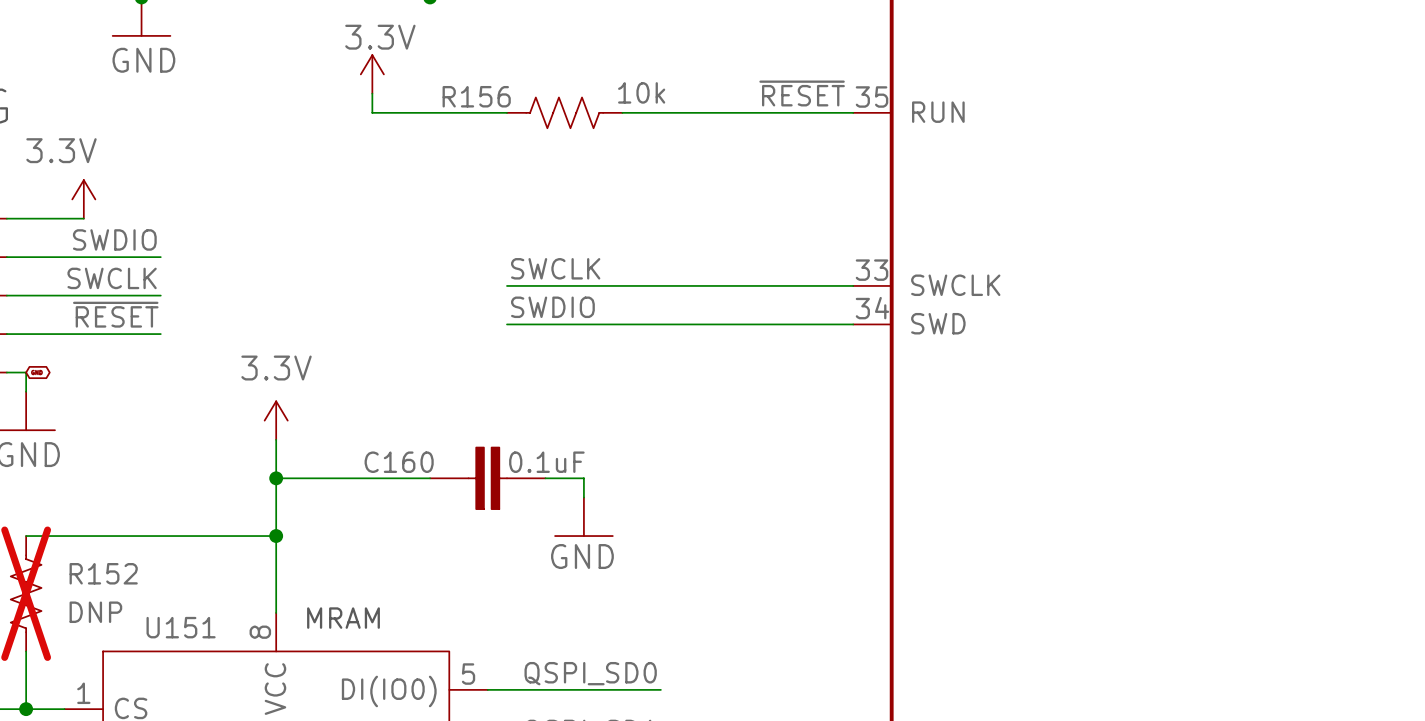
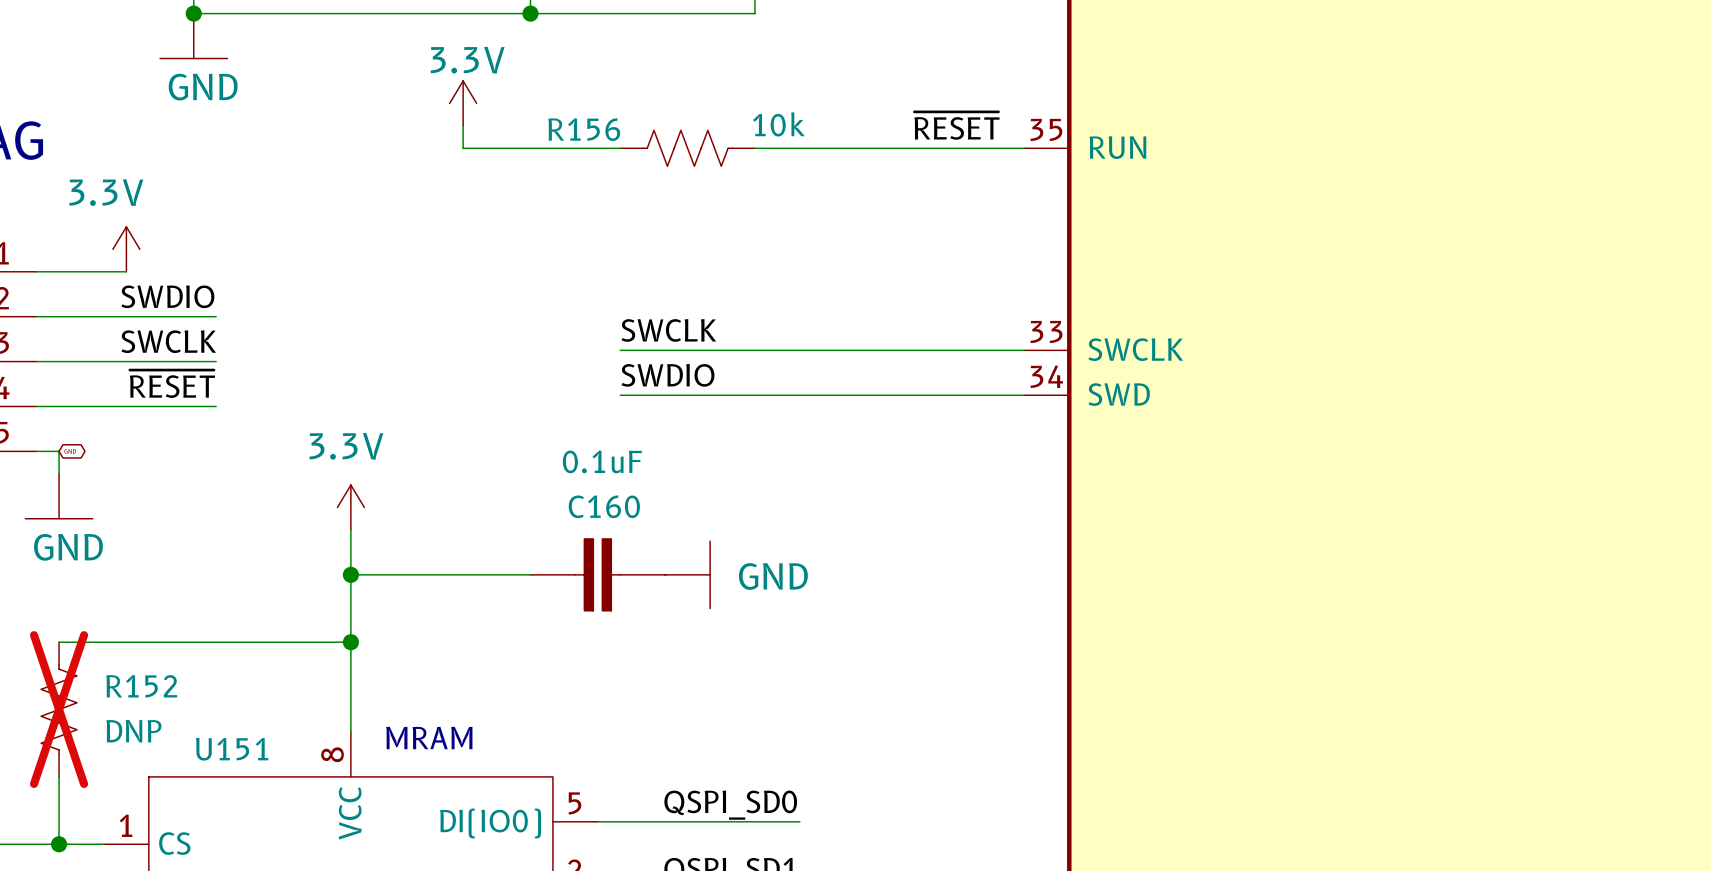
C160 name position: C160 (399, 462) -> C160 (604, 506)
C160 value position: 0.1uF (546, 462) -> 0.1uF (602, 461)
power symbol position: GND (583, 516) -> GND (687, 574)
power symbol rotation: 0° (583, 536) -> 90° counterclockwise (710, 574)

